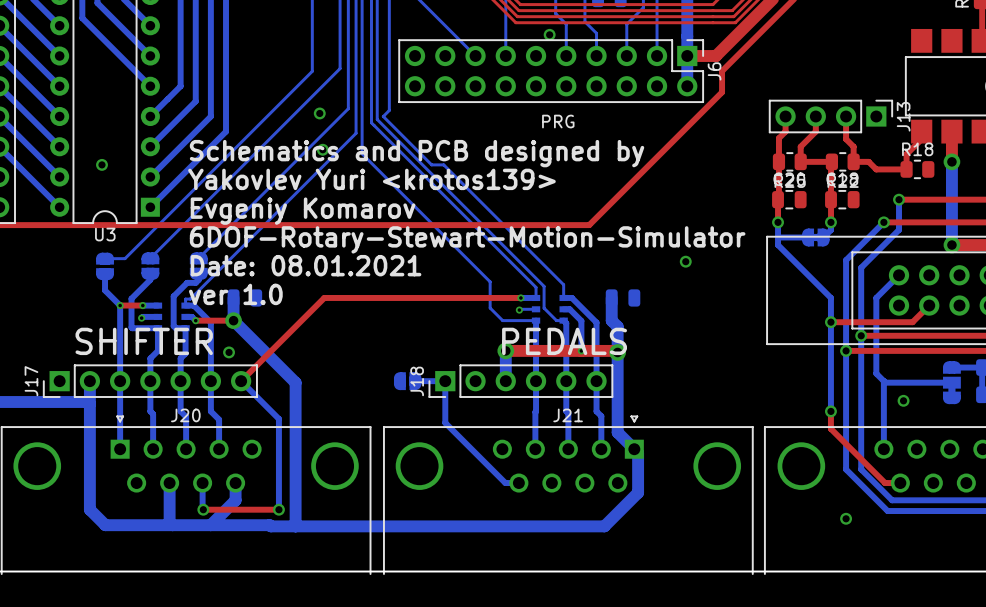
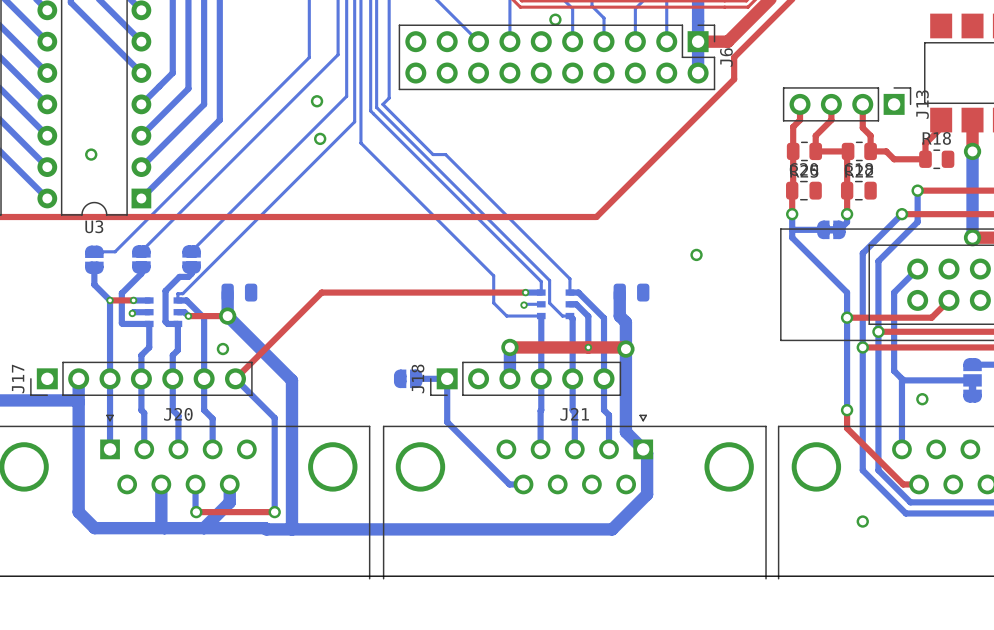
text: PRG (558, 121) -> none
text: Schematics and PCB designed by (417, 153) -> none
text: Yakovlev Yuri <krotos139> (371, 179) -> none
text: Evgeniy Komarov (303, 211) -> none
text: 6DOF-Rotary-Stewart-Motion-Simulator (467, 239) -> none
text: Date: 08.01.2021 (306, 265) -> none
text: ver 1.0 (235, 294) -> none
text: SHIFTER (144, 341) -> none
text: PEDALS (564, 341) -> none

